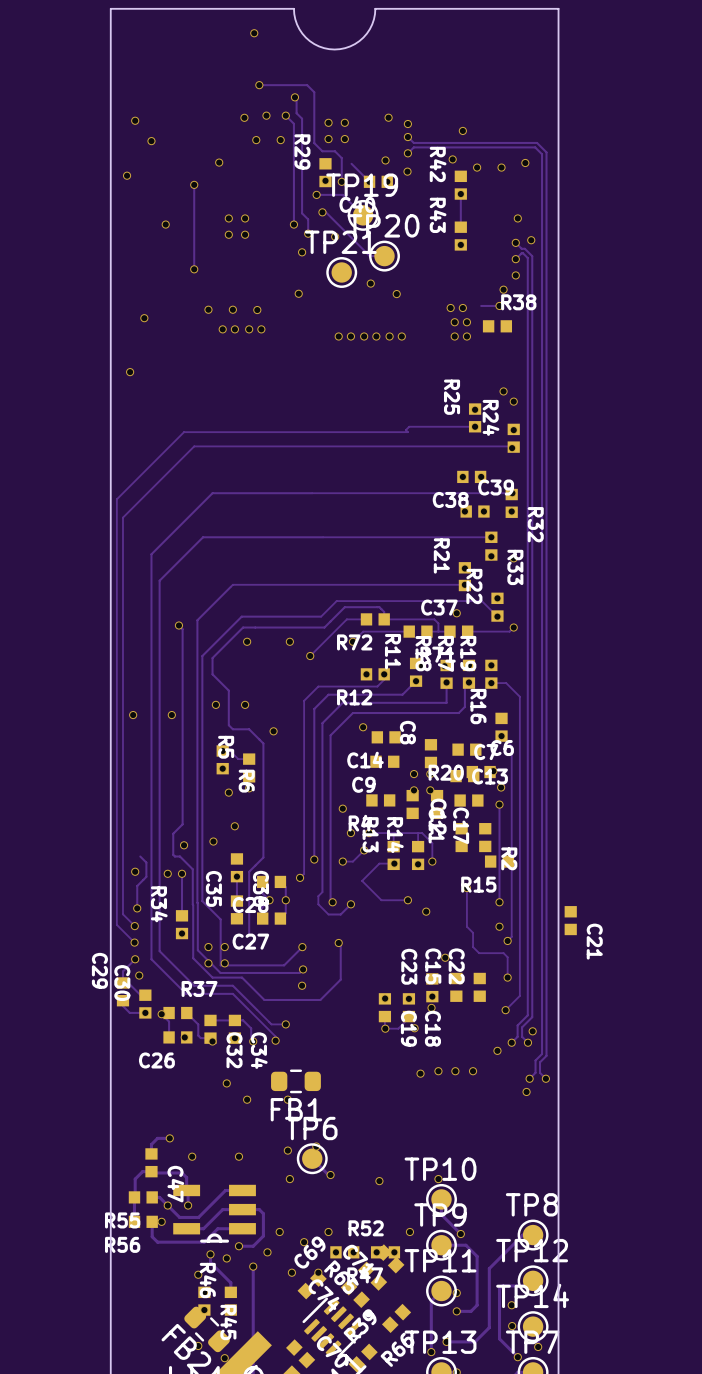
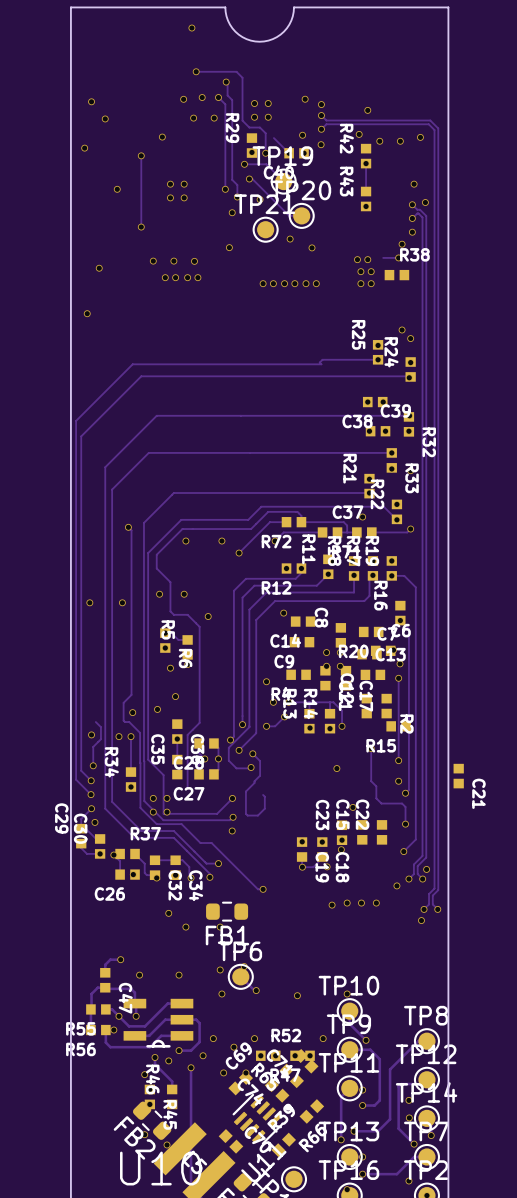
track: none -> (249, 726) (228, 747) (228, 760) (236, 768) (251, 767)
track: (322, 862) (322, 892) (318, 896) (318, 904) (328, 914) (340, 914) (350, 904) -> none
track: (394, 863) (379, 863) (362, 880) (381, 900) (407, 900) -> none
track: (330, 869) (330, 900) (332, 902) -> (256, 733) (239, 750)
via: none -> (239, 750)
track: none -> (252, 753) (260, 761) (260, 775) (245, 791) (245, 813) (257, 815) (264, 808)
via: none -> (252, 753)
via: (407, 900) -> none
via: (332, 902) -> none
via: (350, 904) -> none
via: none -> (251, 767)
via: (338, 942) -> none
track: (340, 959) (340, 979) (320, 999) (277, 999) -> (263, 889) (257, 889) (211, 843)
via: none -> (263, 889)

